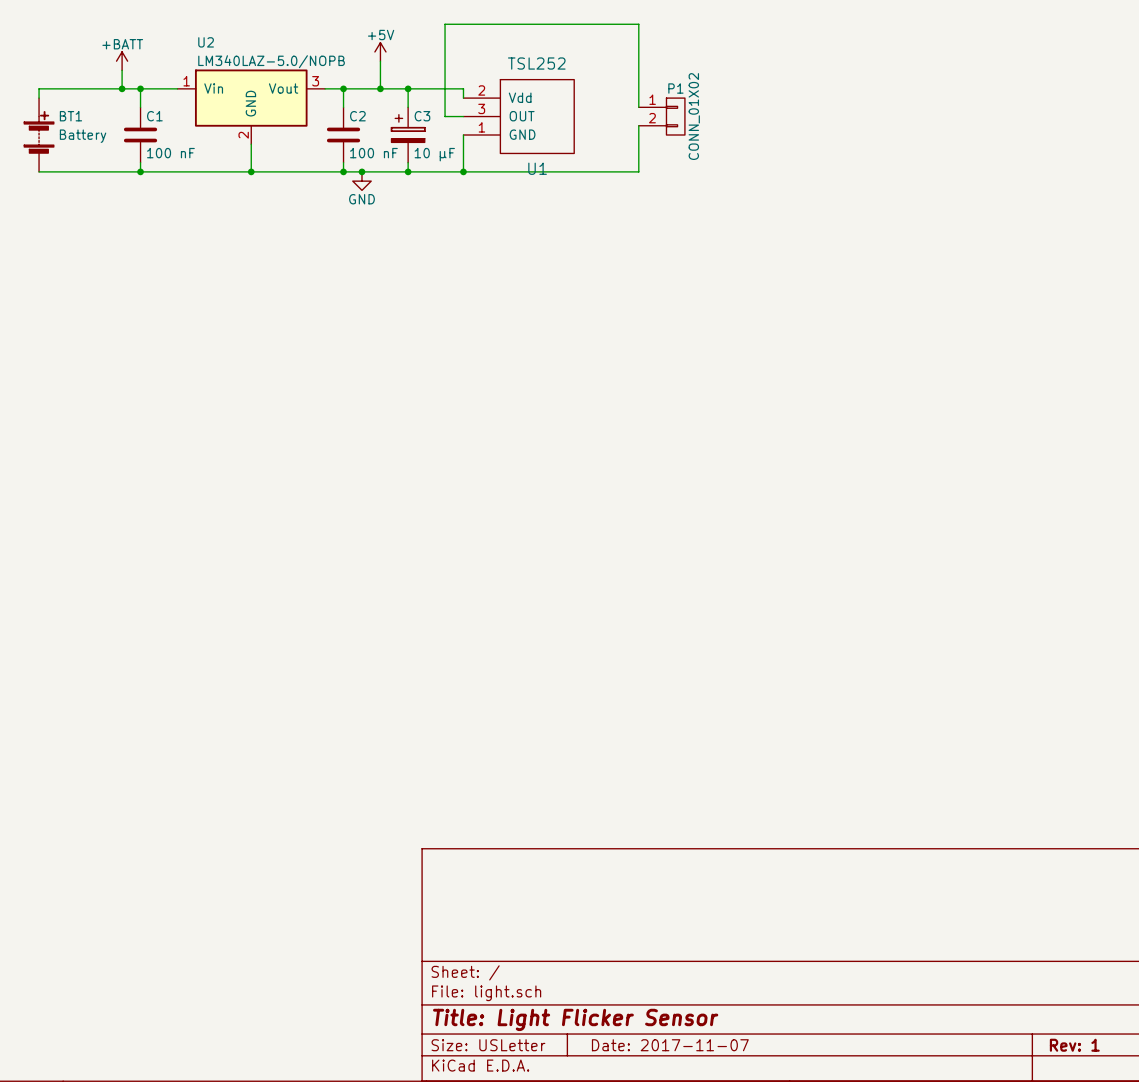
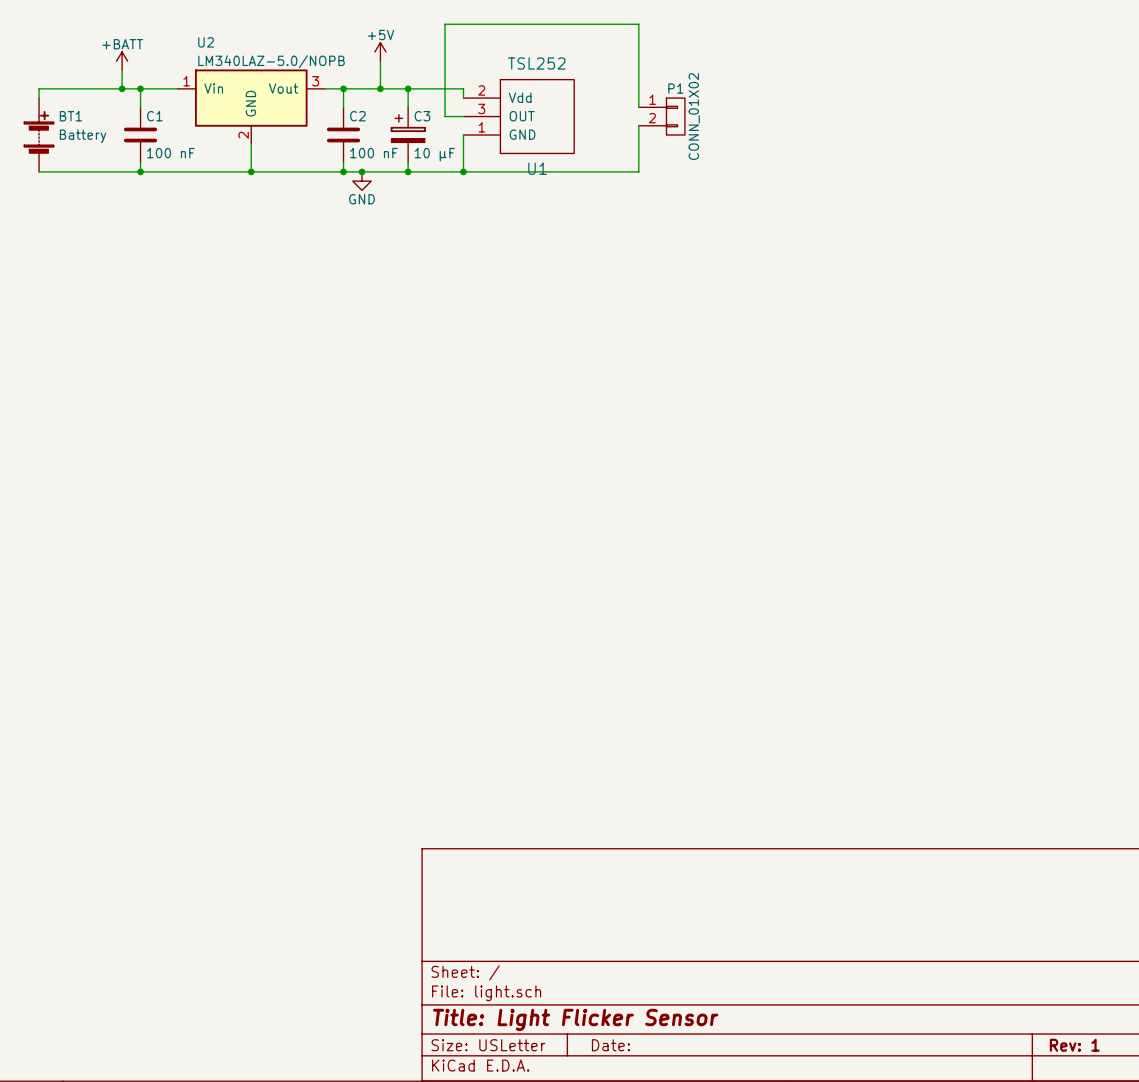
title block: Date: 2017-11-07 (670, 1045) -> Date: (610, 1045)

